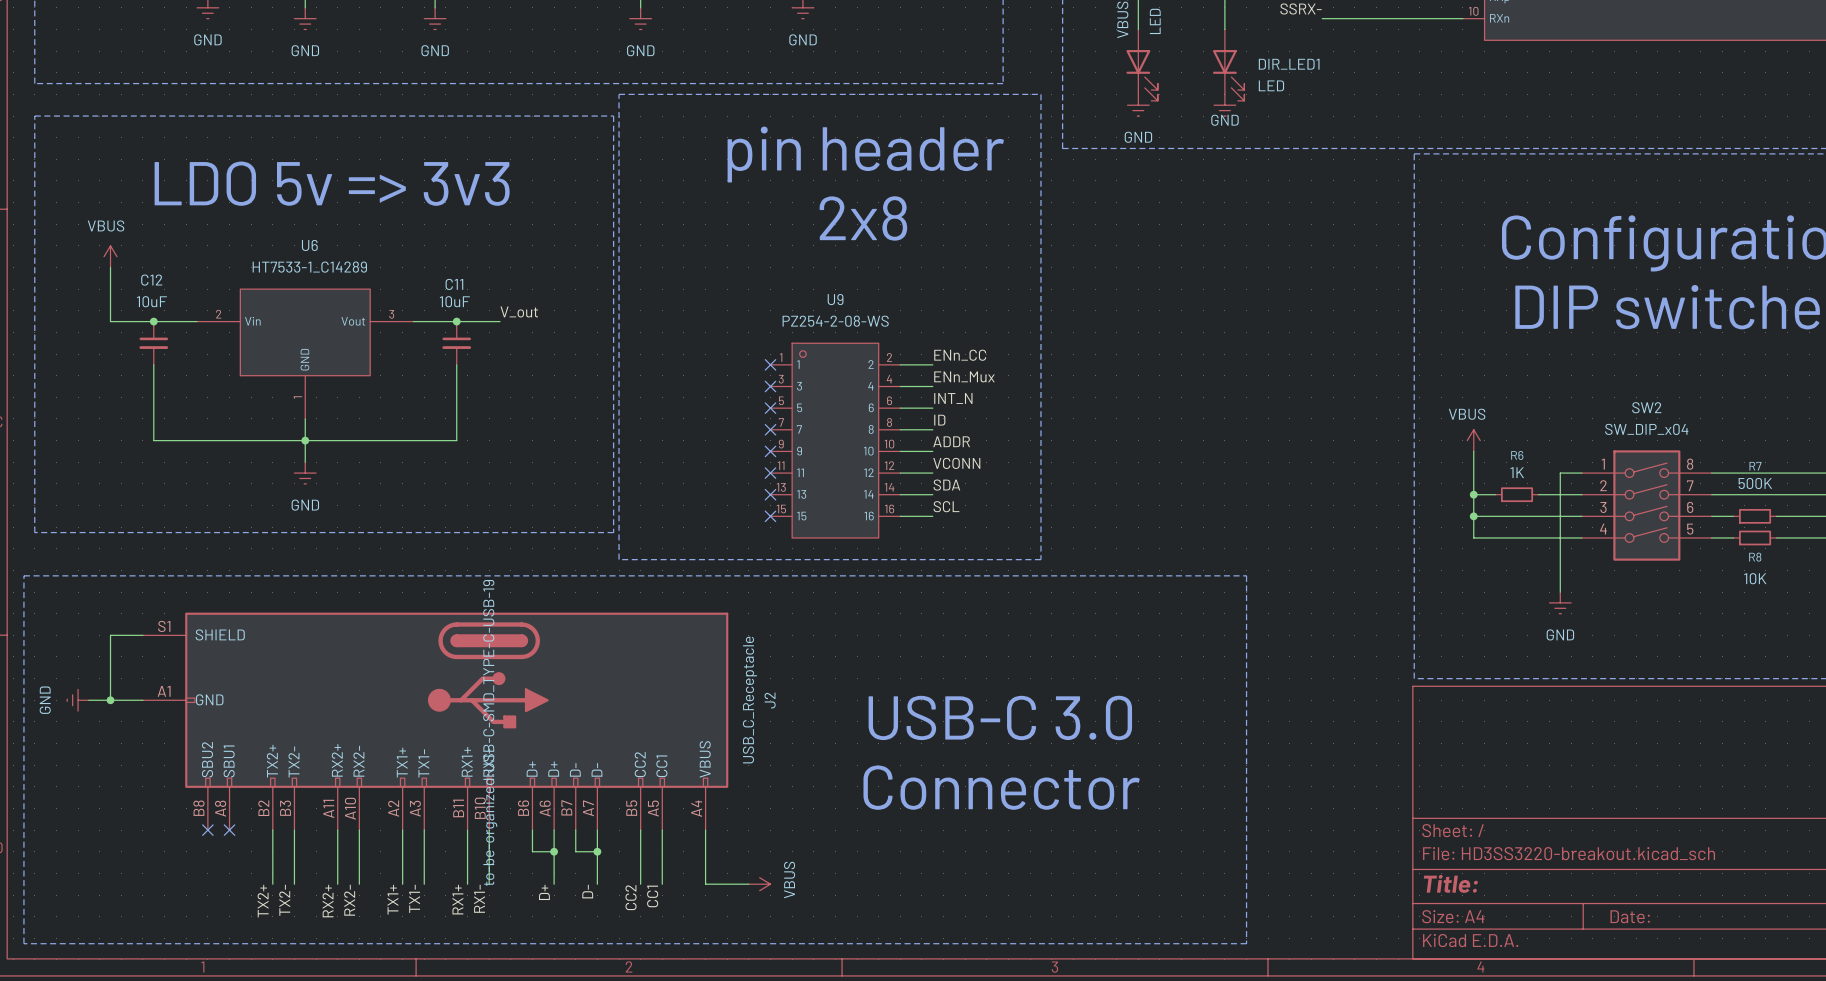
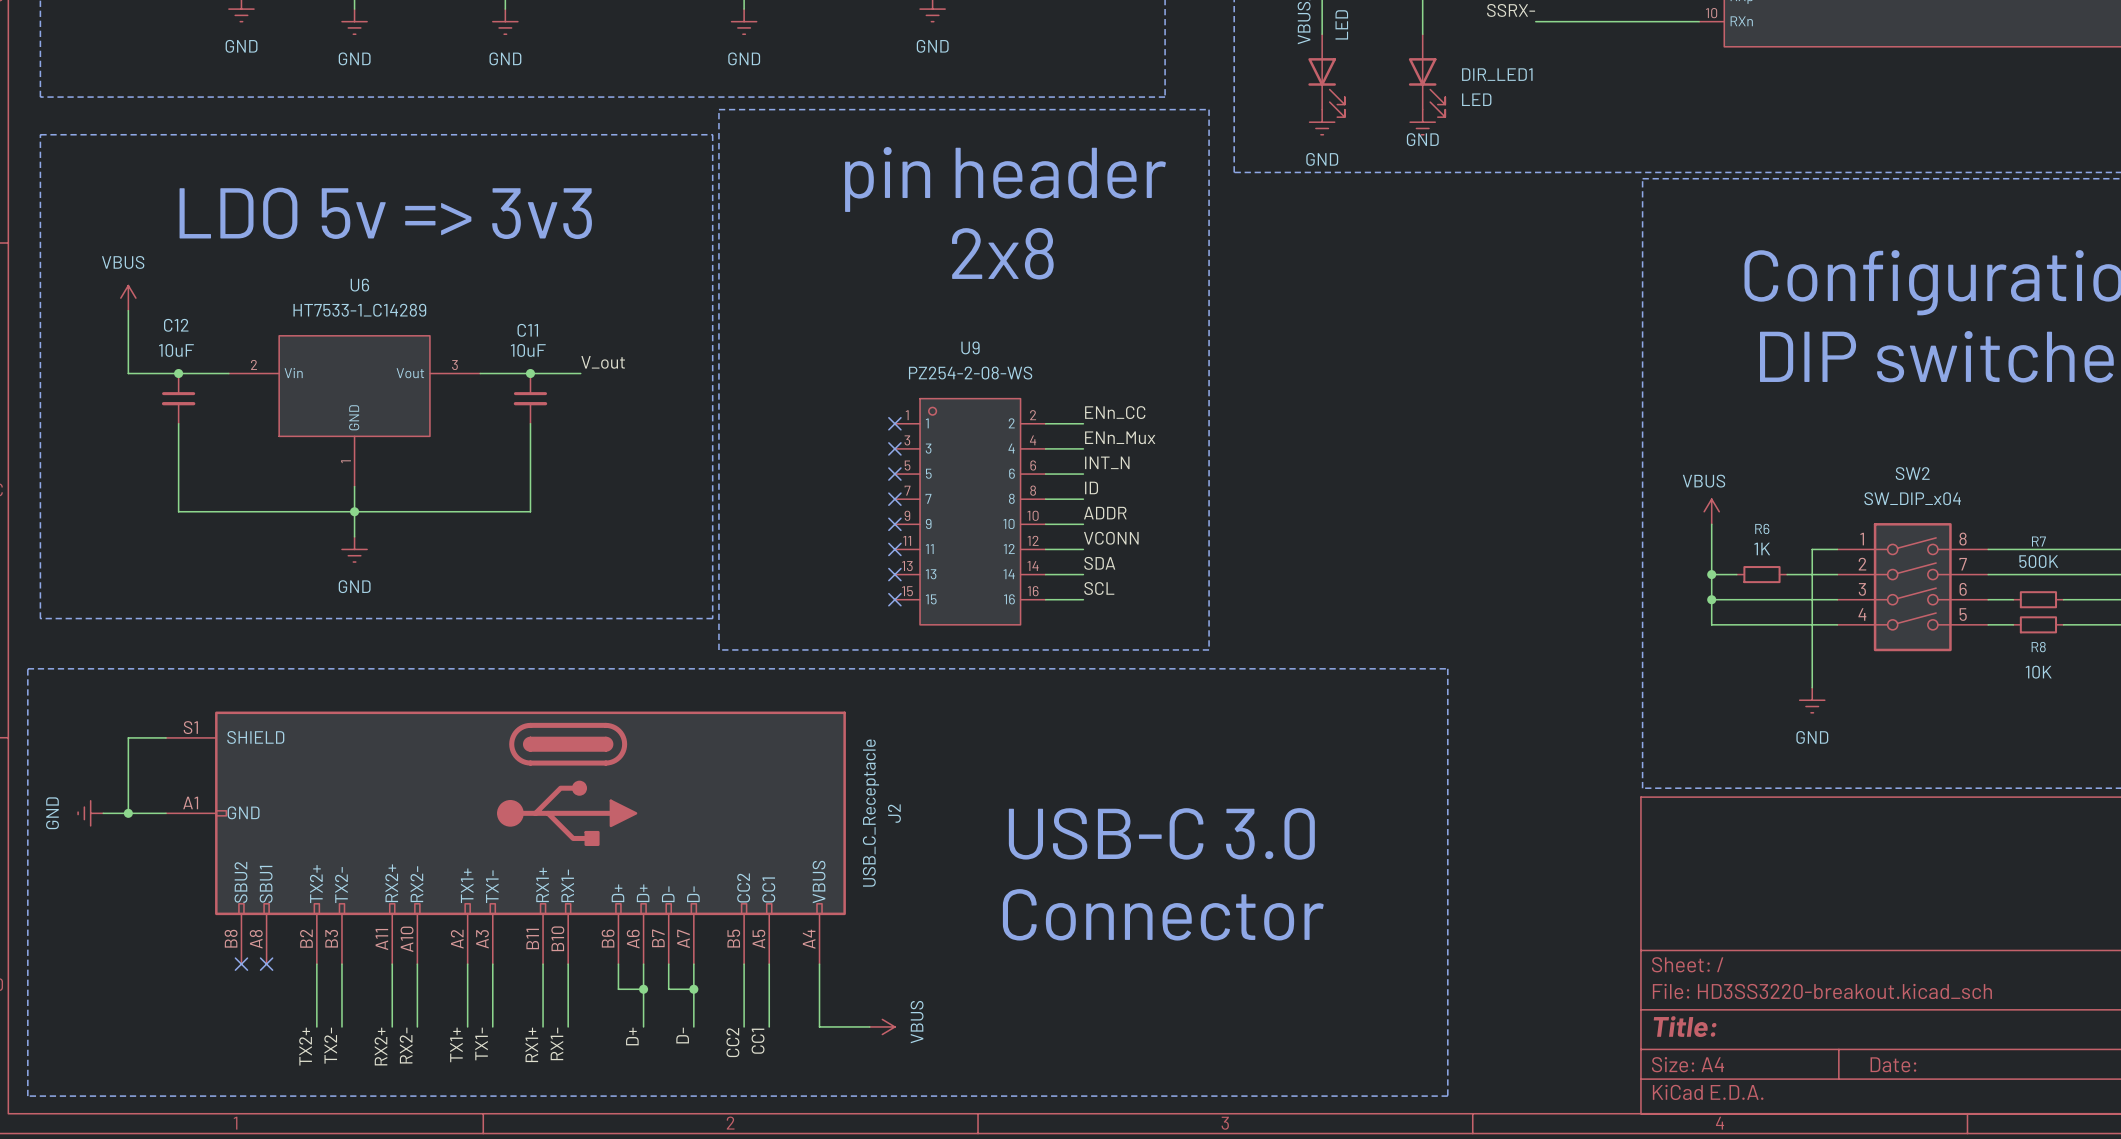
J2 text: to-be-organized:USB-C-SMD_TYPE-C-USB-19 (490, 732) -> none

